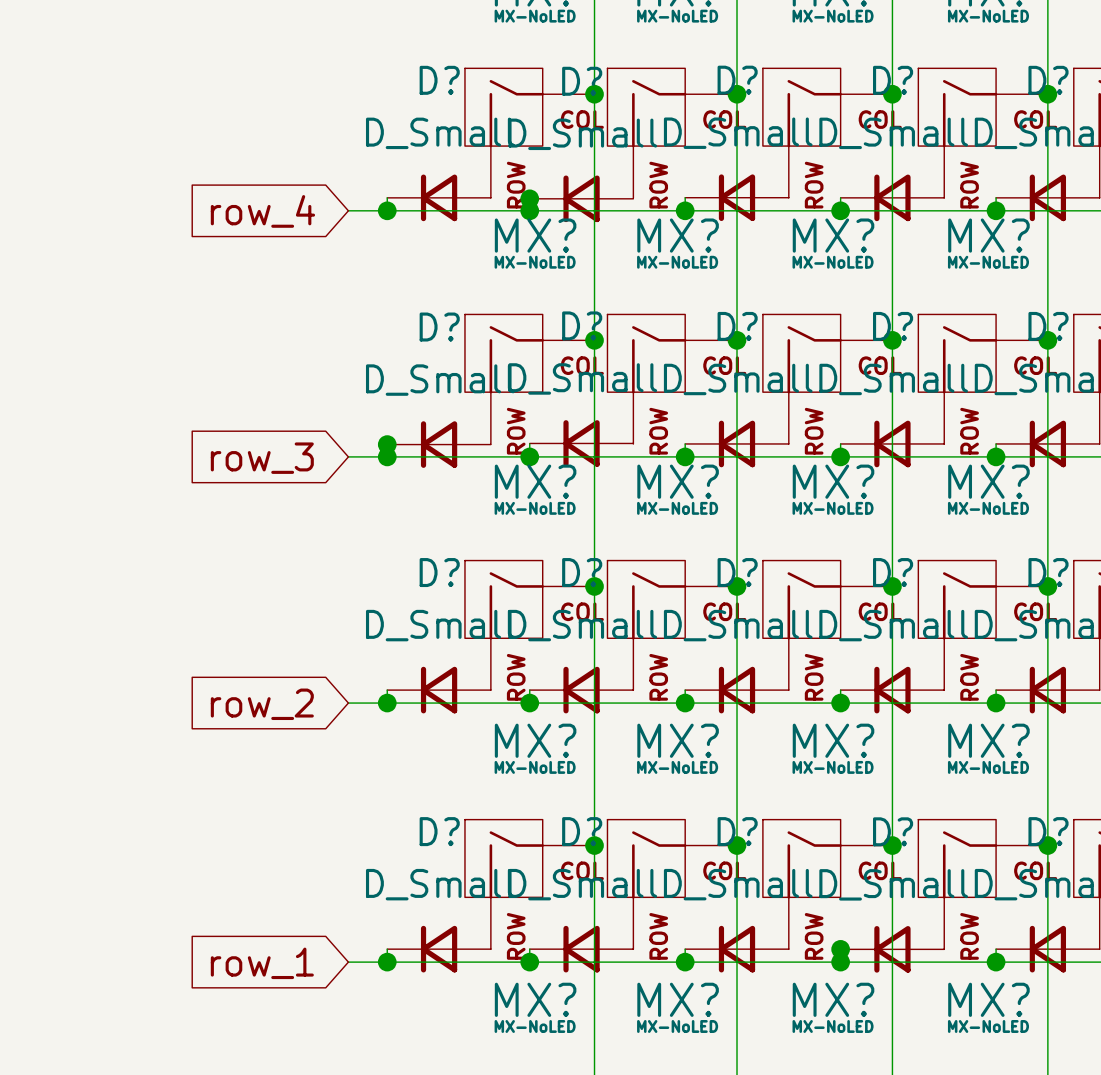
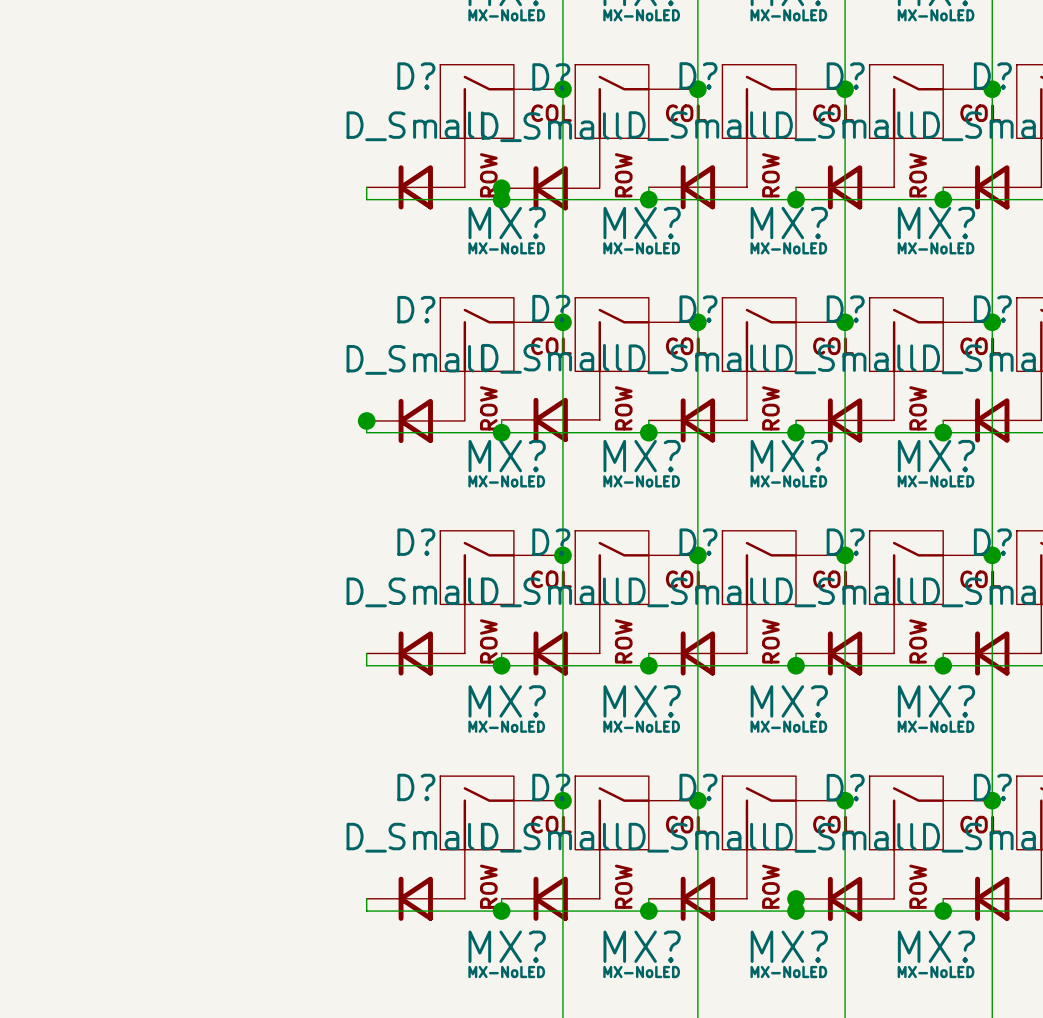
wire: (348, 210) (387, 210) -> none
junction: (387, 210) -> none
global label: row_4 (262, 211) -> none
wire: (348, 456) (387, 456) -> none
junction: (387, 456) -> none
global label: row_3 (262, 458) -> none
wire: (348, 703) (387, 703) -> none
junction: (387, 703) -> none
global label: row_2 (262, 704) -> none
wire: (348, 962) (387, 962) -> none
junction: (387, 962) -> none
global label: row_1 (262, 963) -> none

